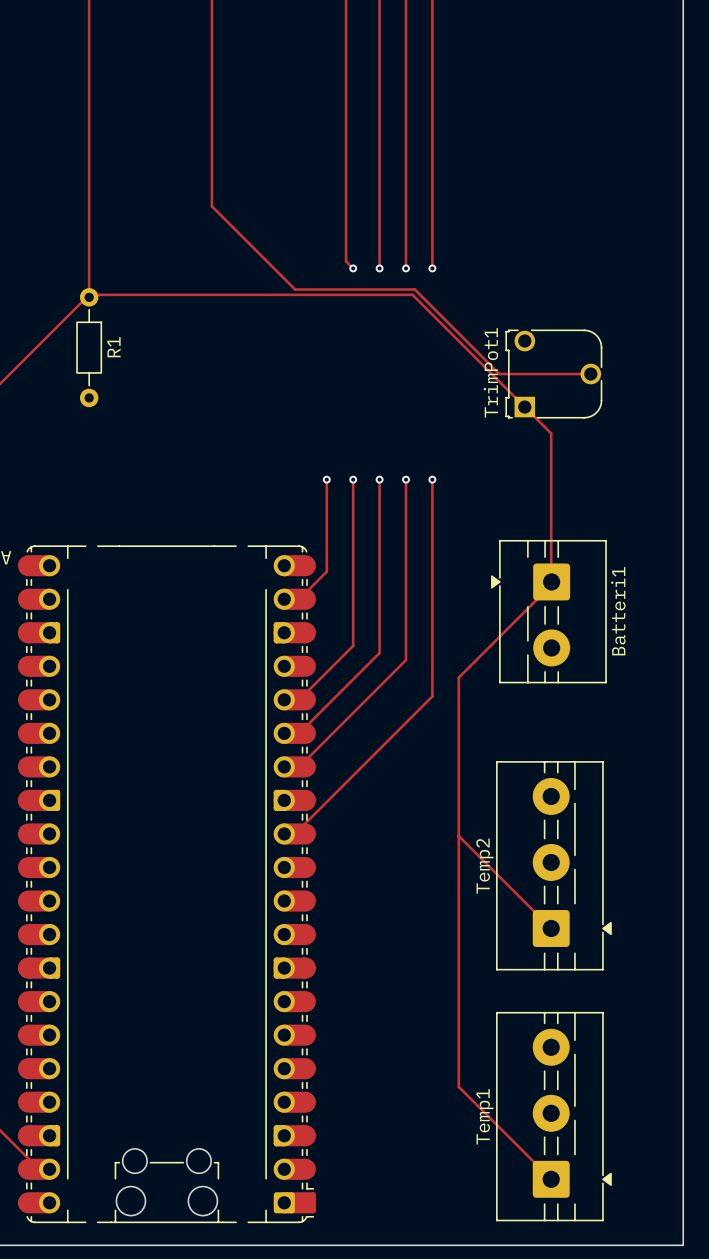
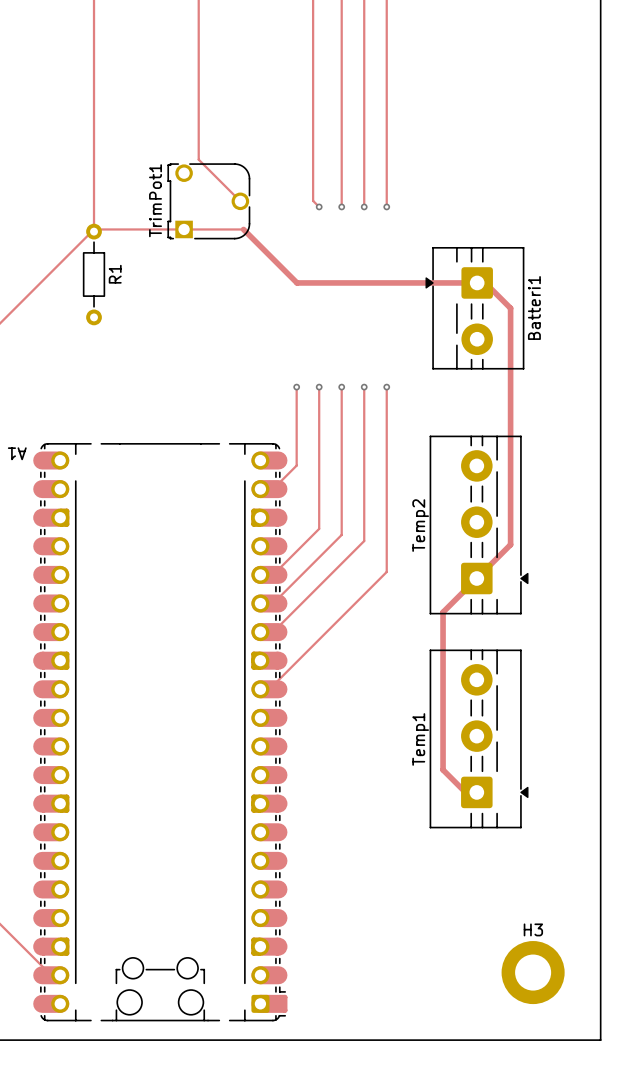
track: (211, 206) (295, 289) (414, 289) (499, 374) (590, 374) -> (198, 154) (198, 159) (240, 201)
track: (264, 294) (412, 294) (551, 433) (551, 585) (458, 677) (458, 1086) (551, 1179) -> (243, 229) (297, 282) (485, 282) (510, 308) (510, 544) (443, 612) (443, 769) (465, 792) (476, 792)
TrimPot1 position: (553, 374) -> (208, 201)
Batteri1 position: (548, 611) -> (474, 308)
track: (458, 836) (551, 928) -> none
Temp2 position: (553, 865) -> (479, 525)
Temp1 position: (553, 1116) -> (479, 738)
H3: none -> (533, 972)

